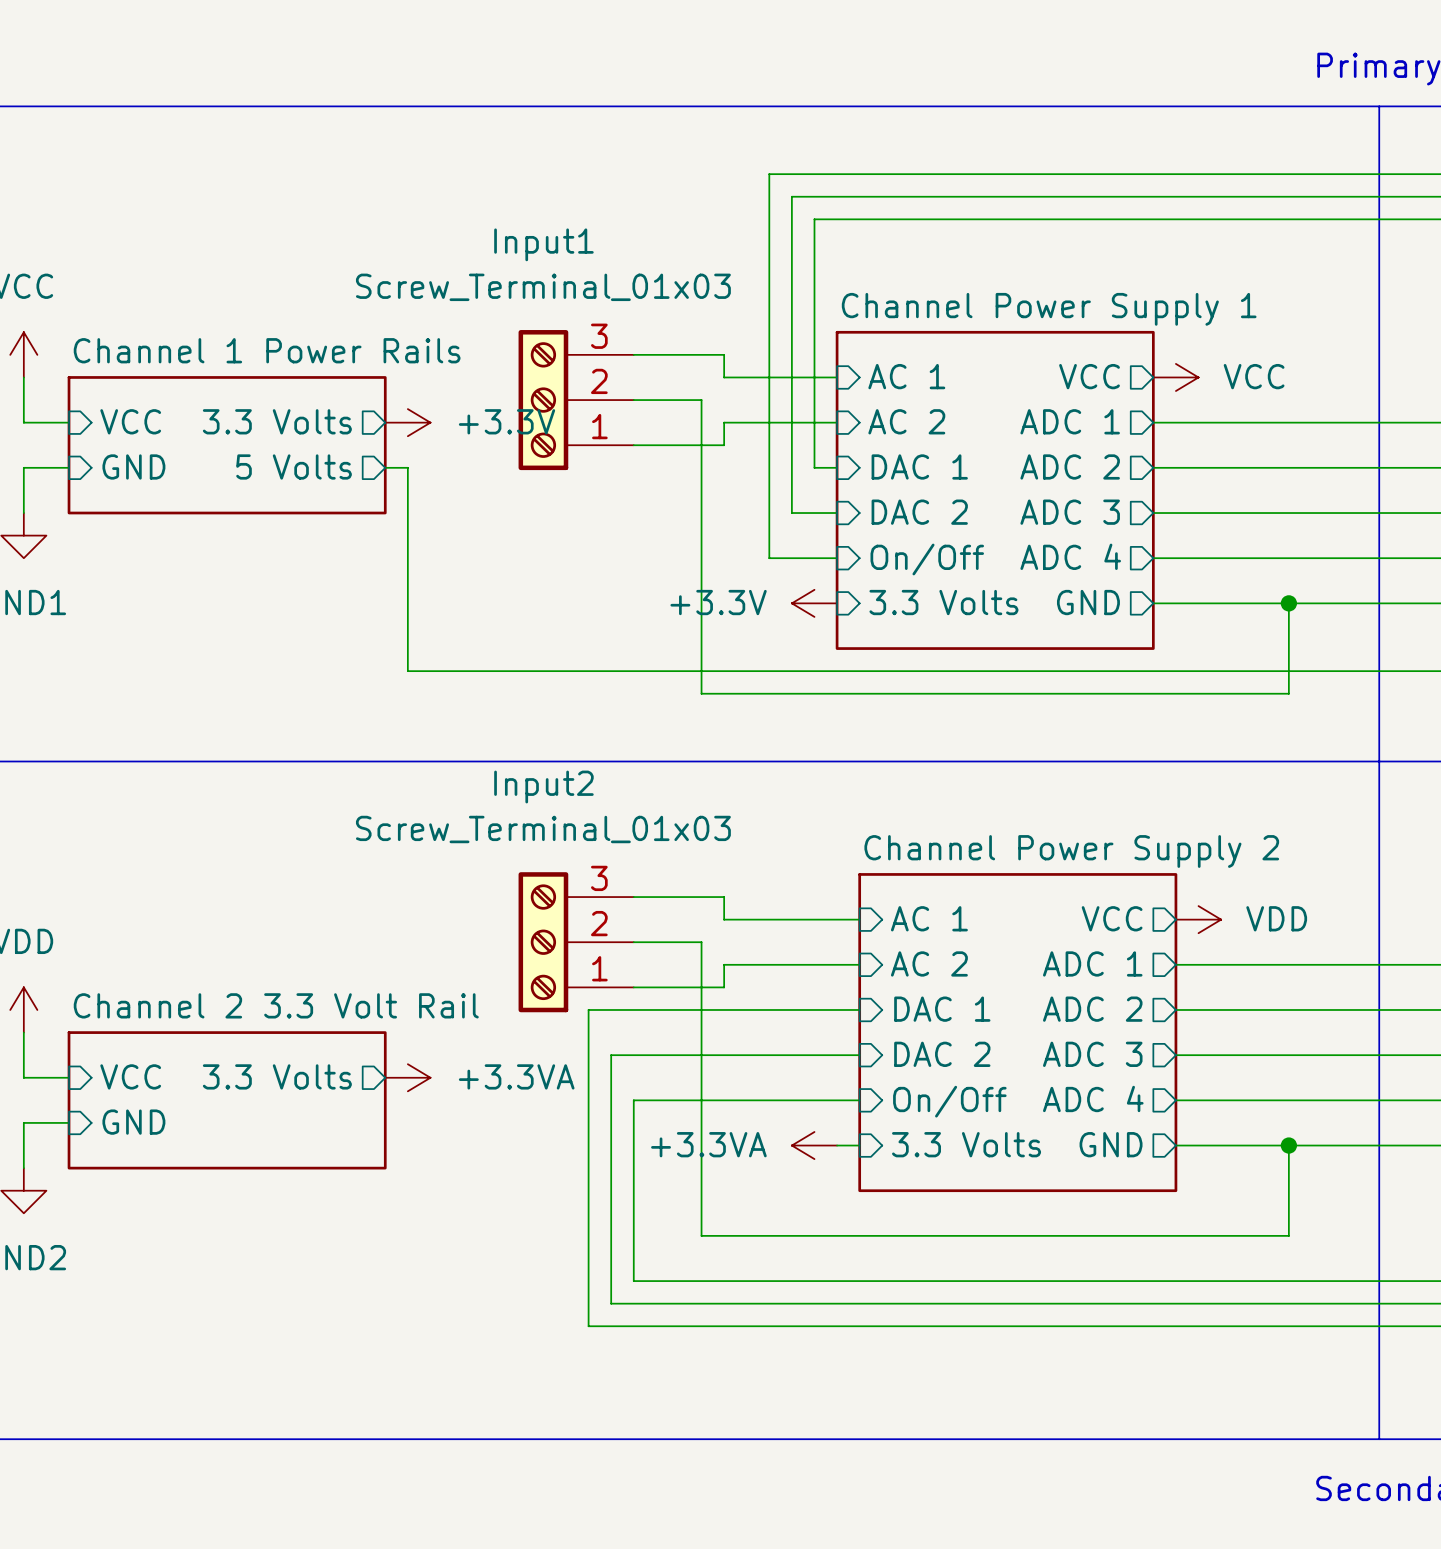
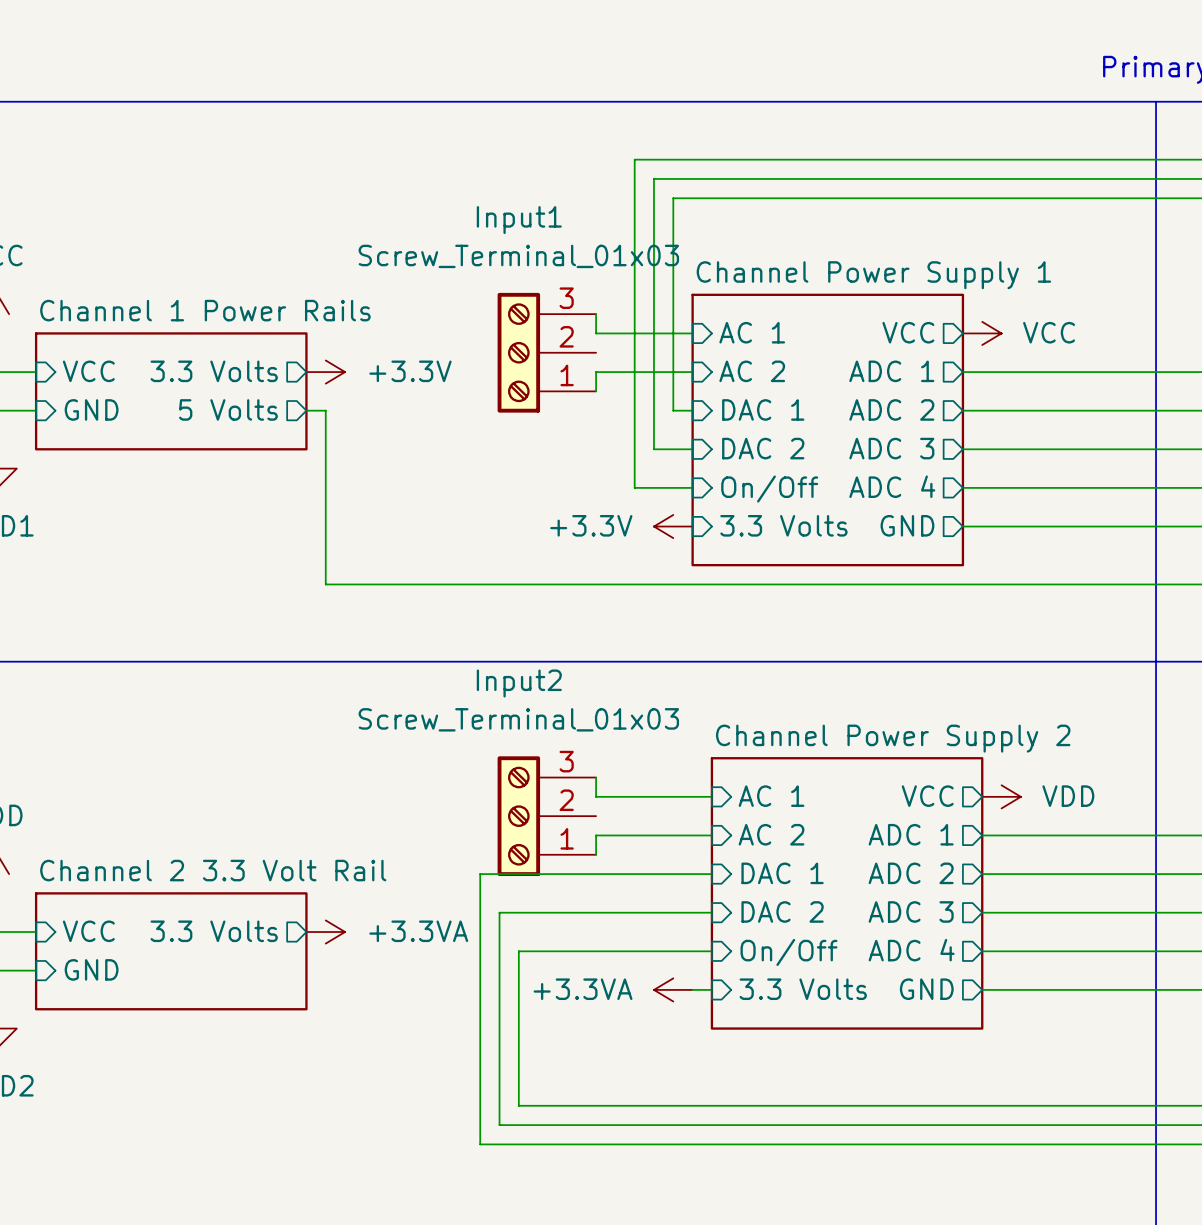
Input1 position: (576, 400) -> (546, 352)
wire: (633, 400) (701, 400) (701, 693) (1288, 693) (1288, 603) -> none
junction: (1288, 603) -> none
Input2 position: (576, 942) -> (546, 816)
wire: (633, 942) (701, 942) (701, 1235) (1288, 1235) (1288, 1145) -> none
junction: (1288, 1145) -> none

